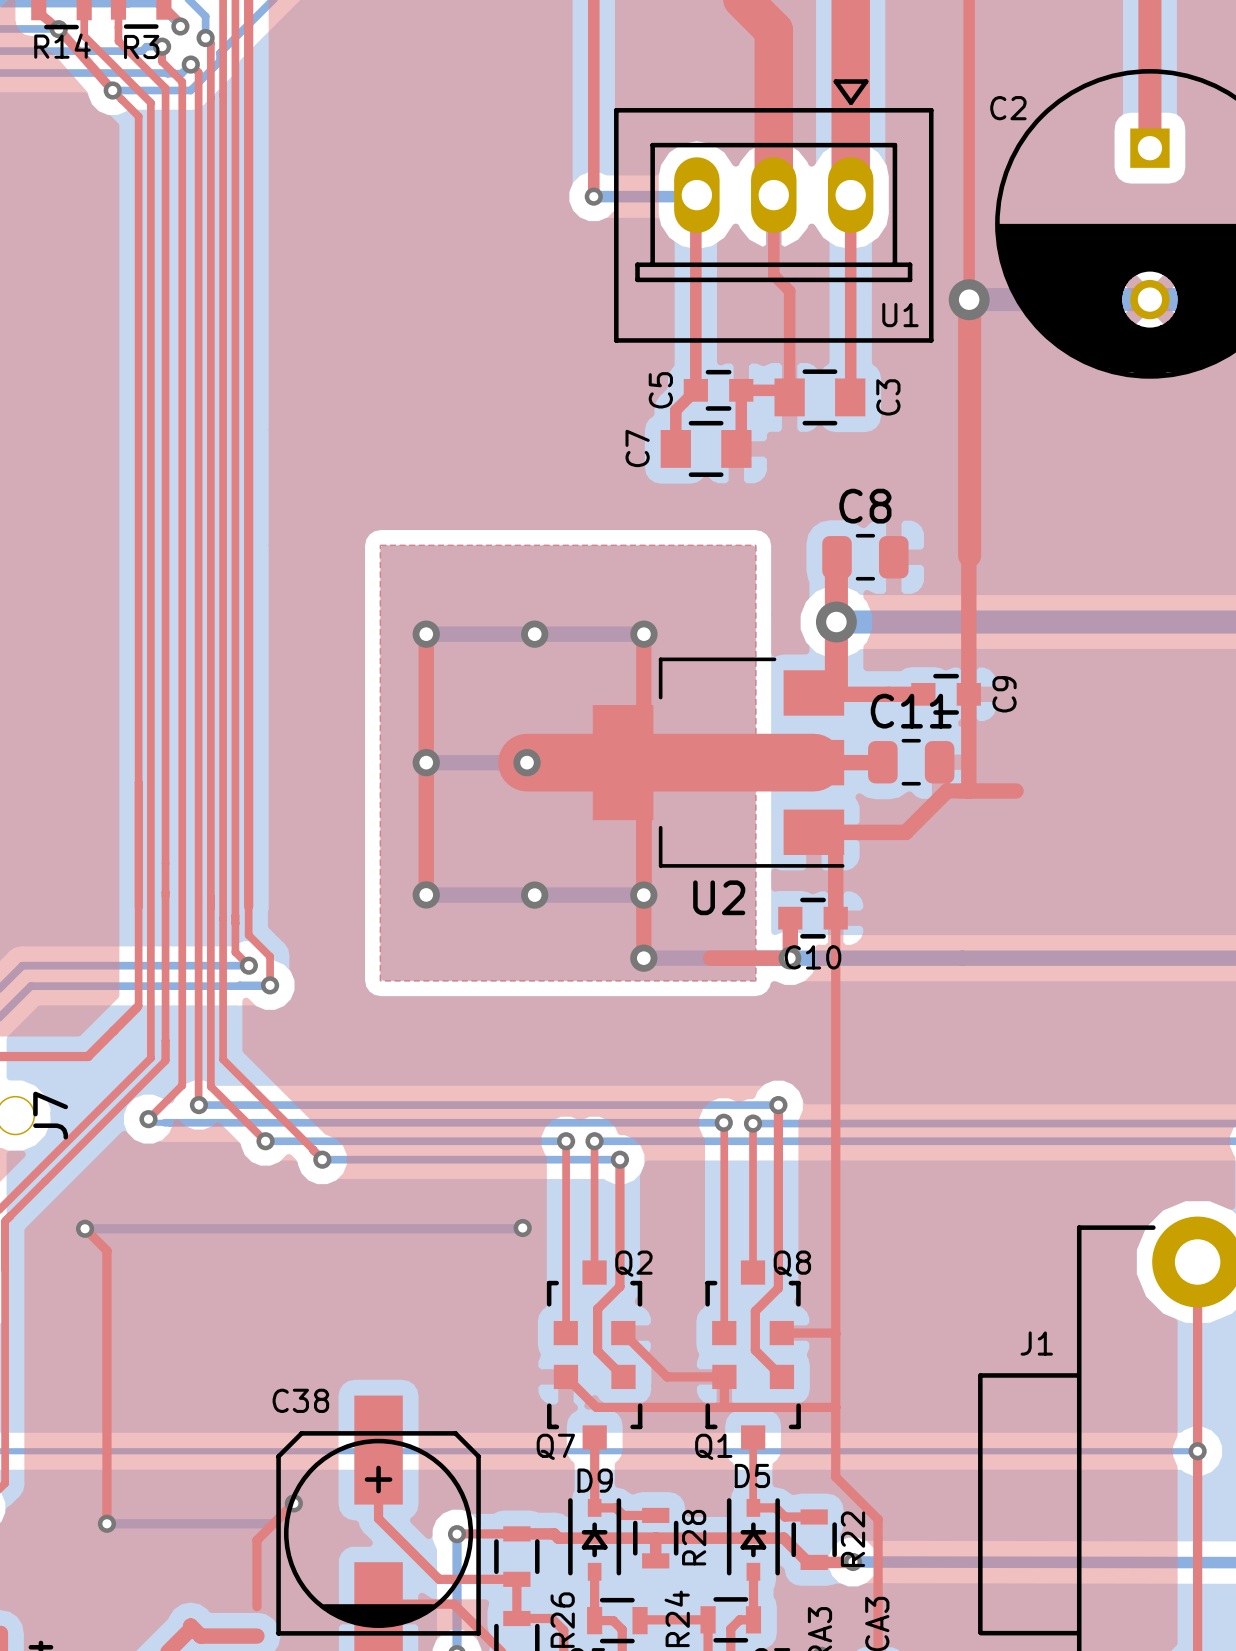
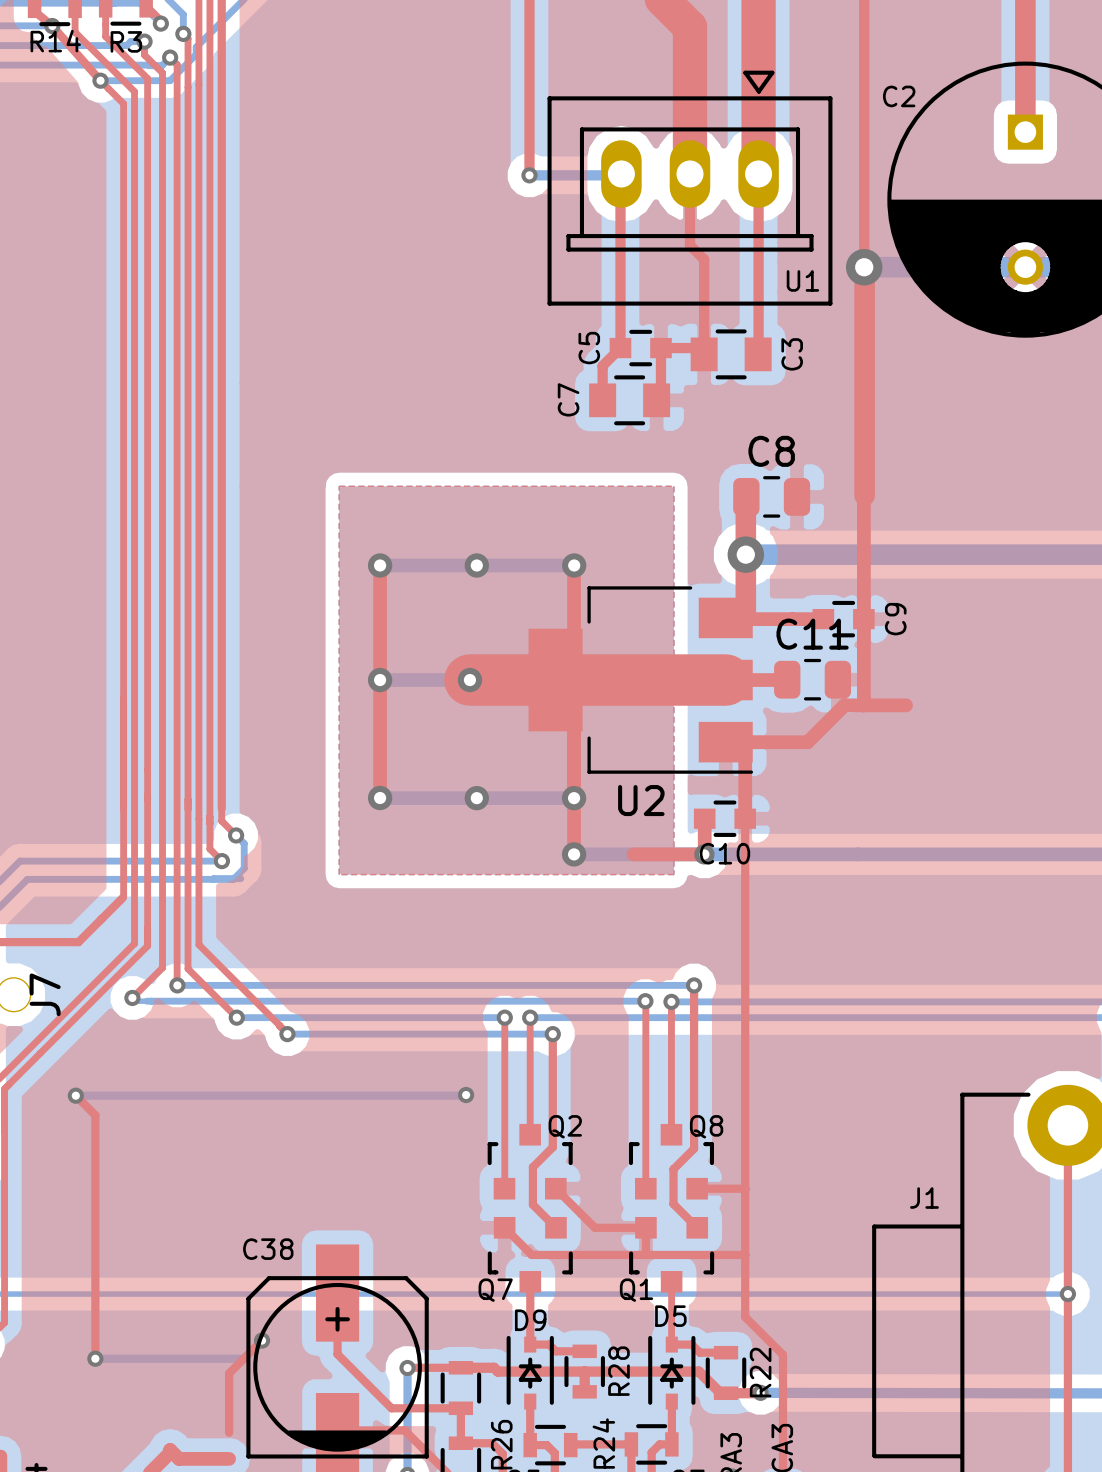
top track: (248, 920) (248, 935) (270, 956) (270, 985) -> (221, 821) (236, 835)
bottom track: none -> (235, 835) (244, 843) (244, 868) (233, 879)
via position: (270, 985) -> (236, 835)

